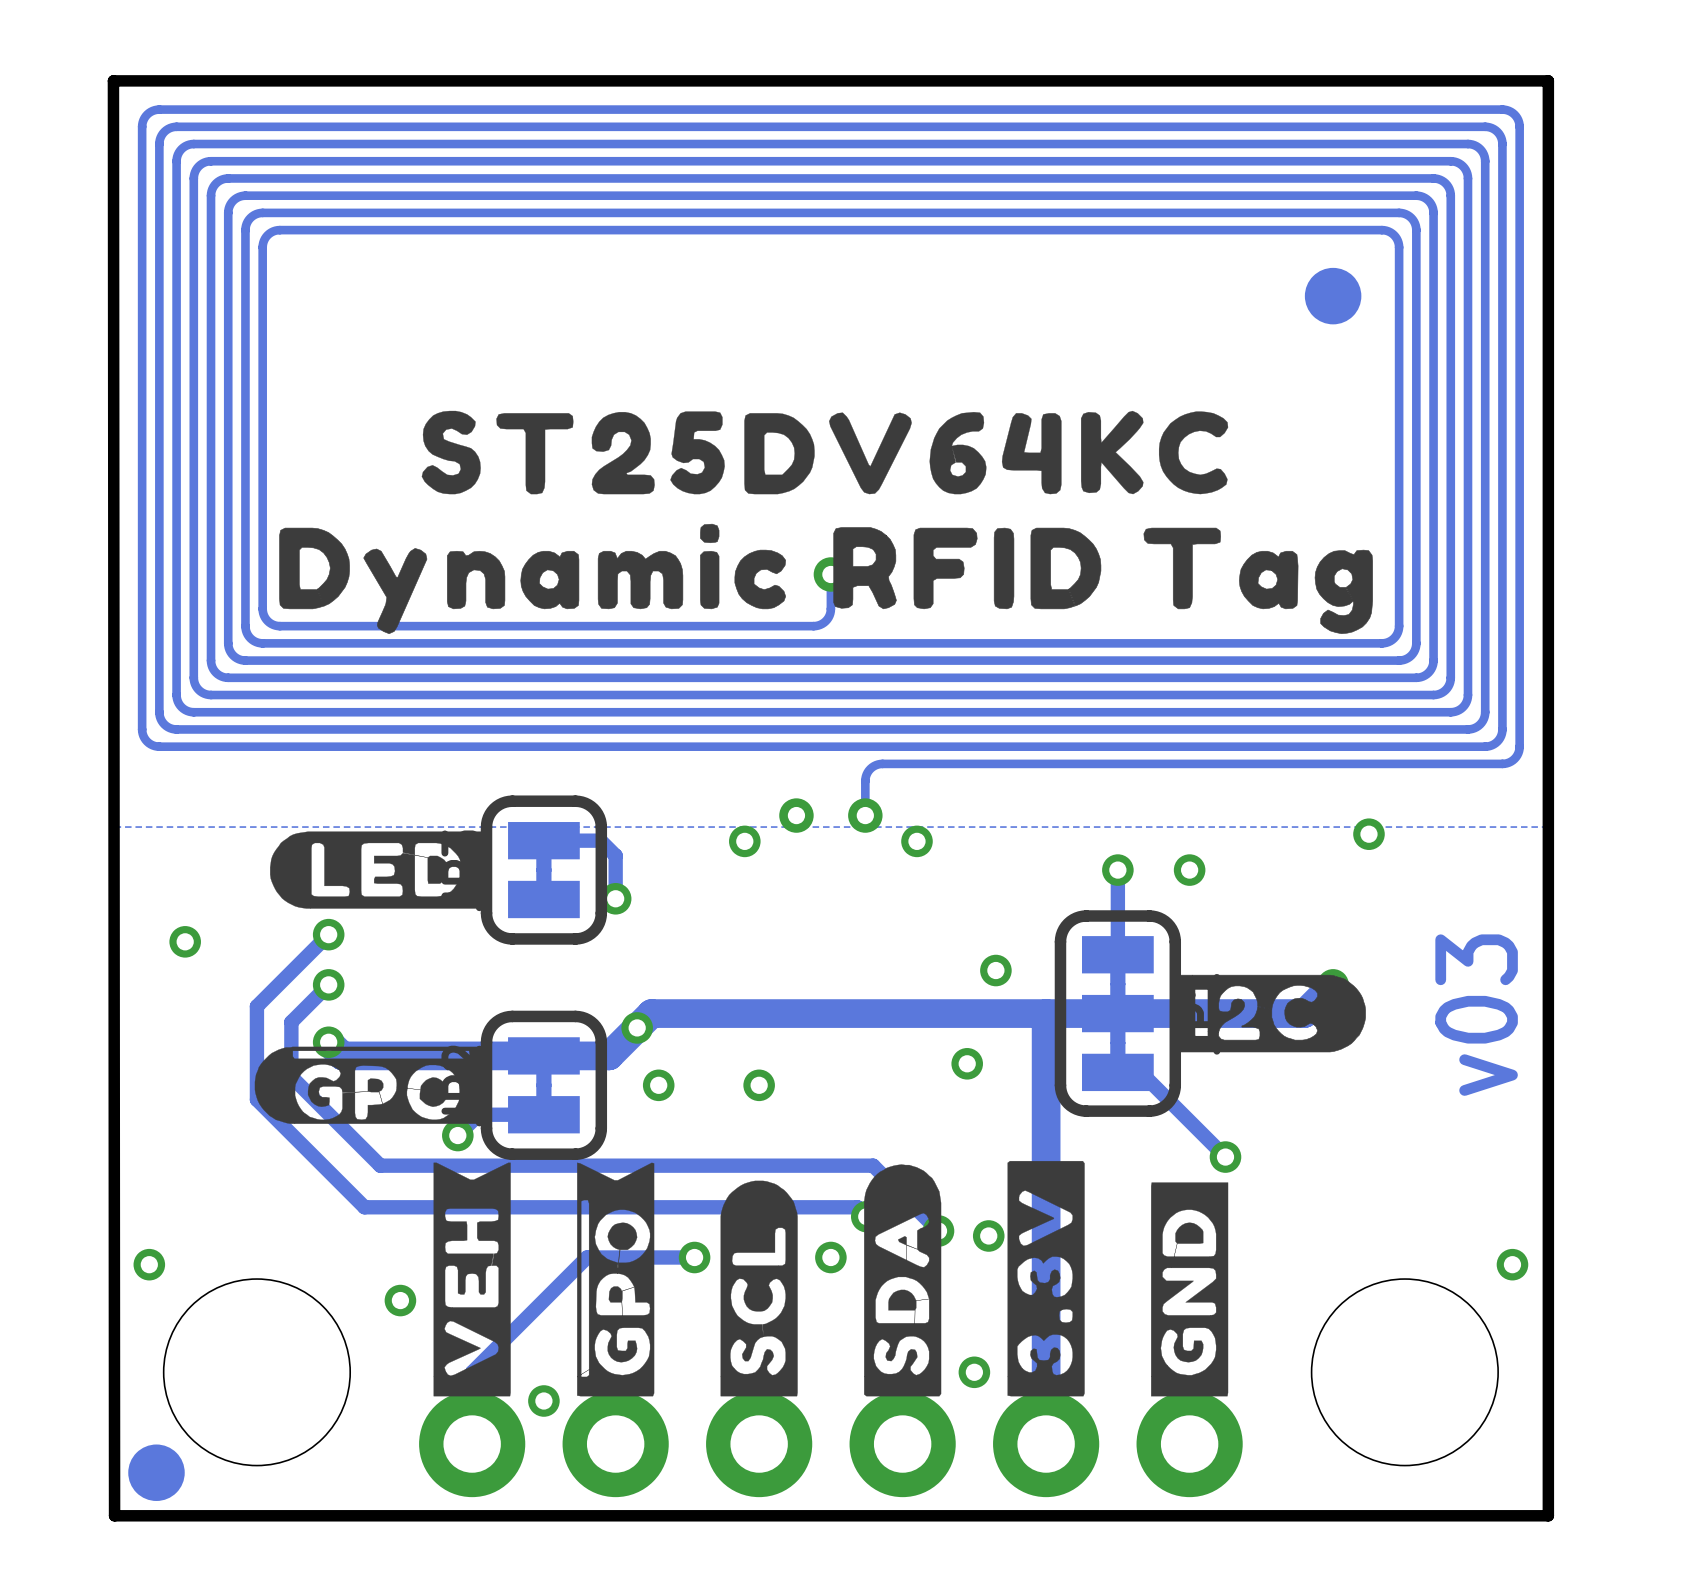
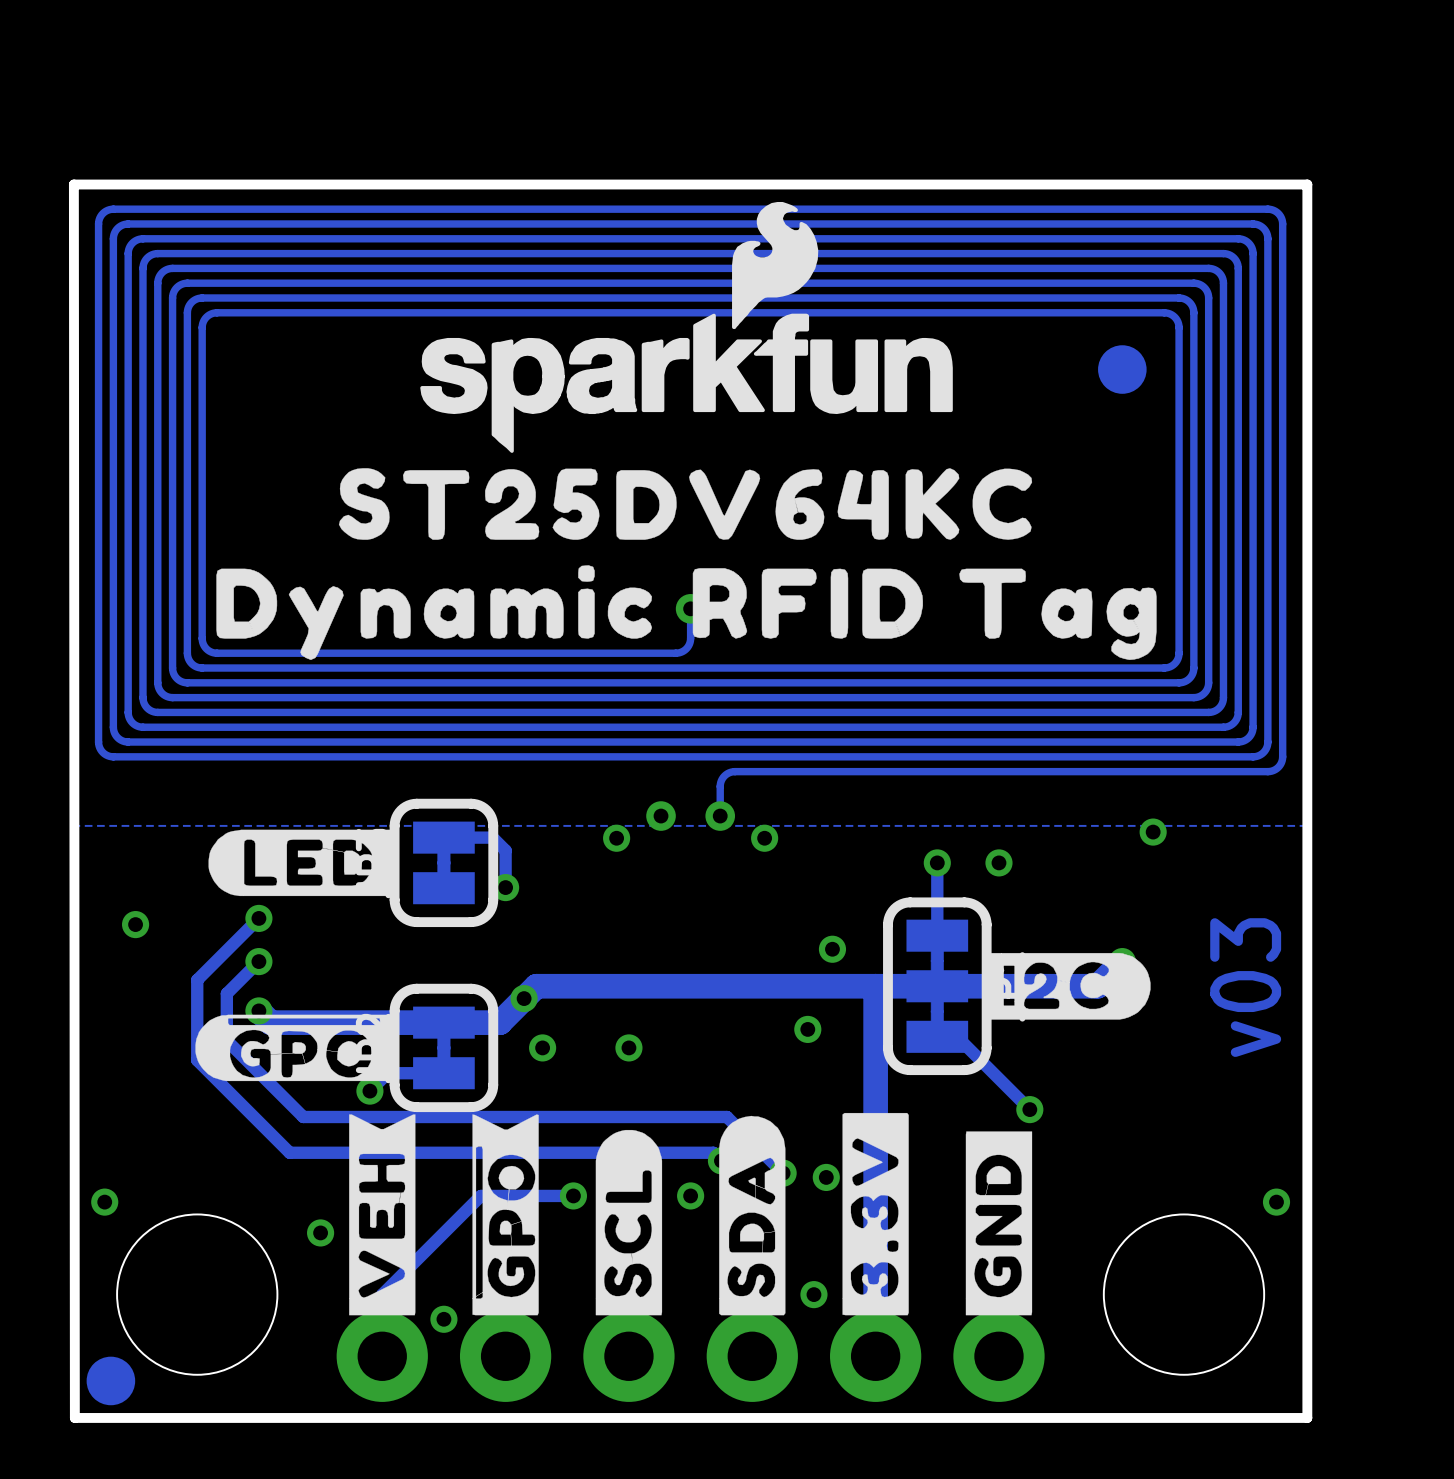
drawing: none -> [420, 201, 953, 453]

